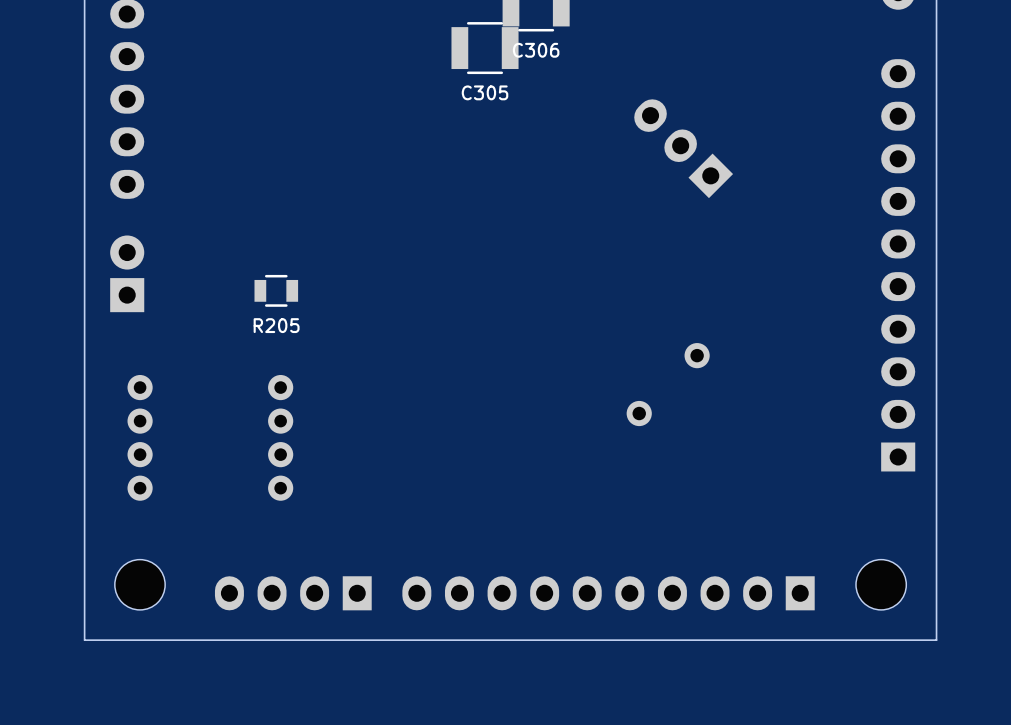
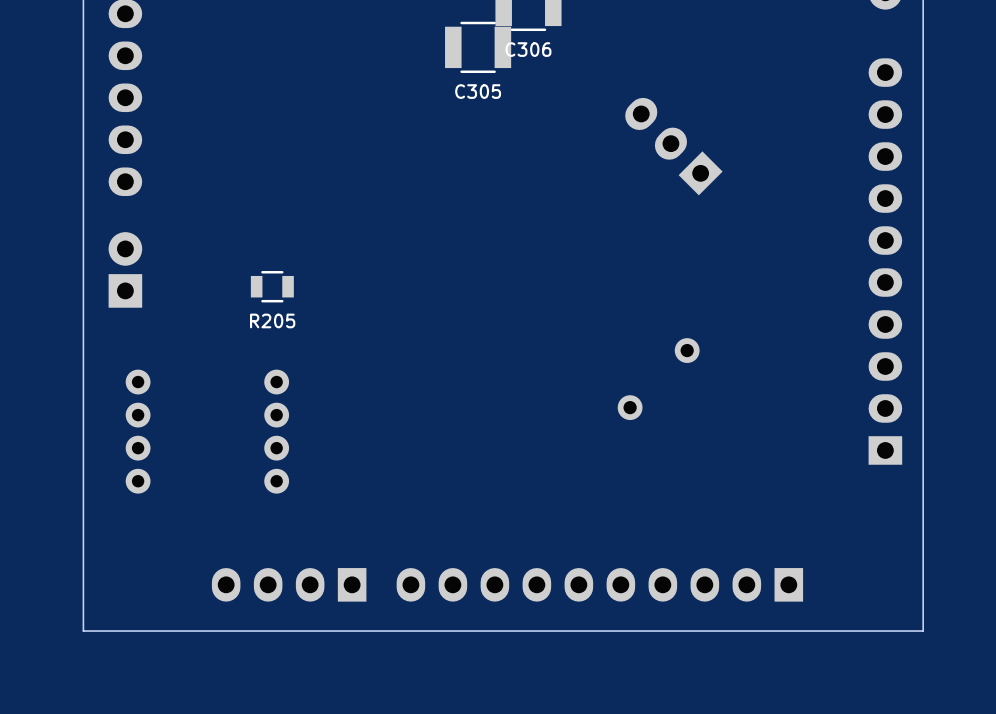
part: (139, 584) -> none
part: (881, 584) -> none

